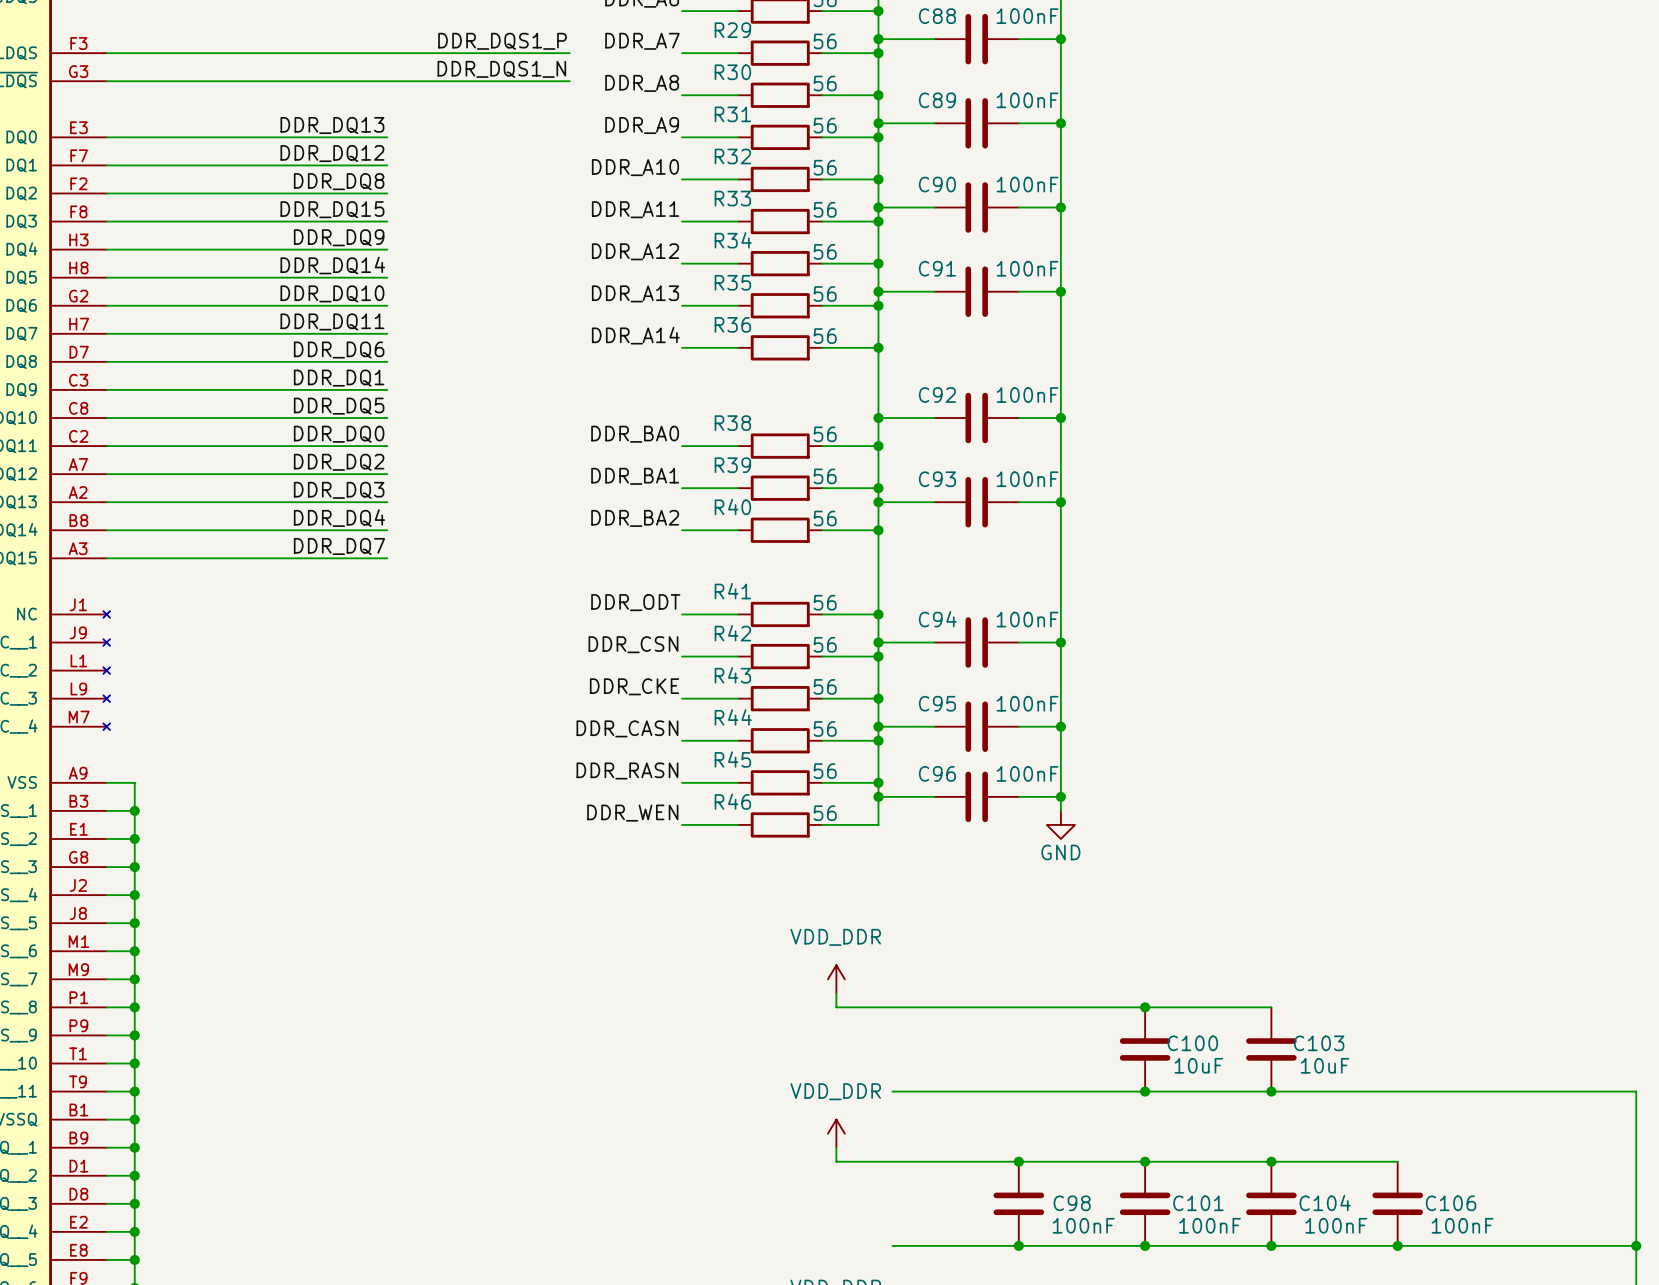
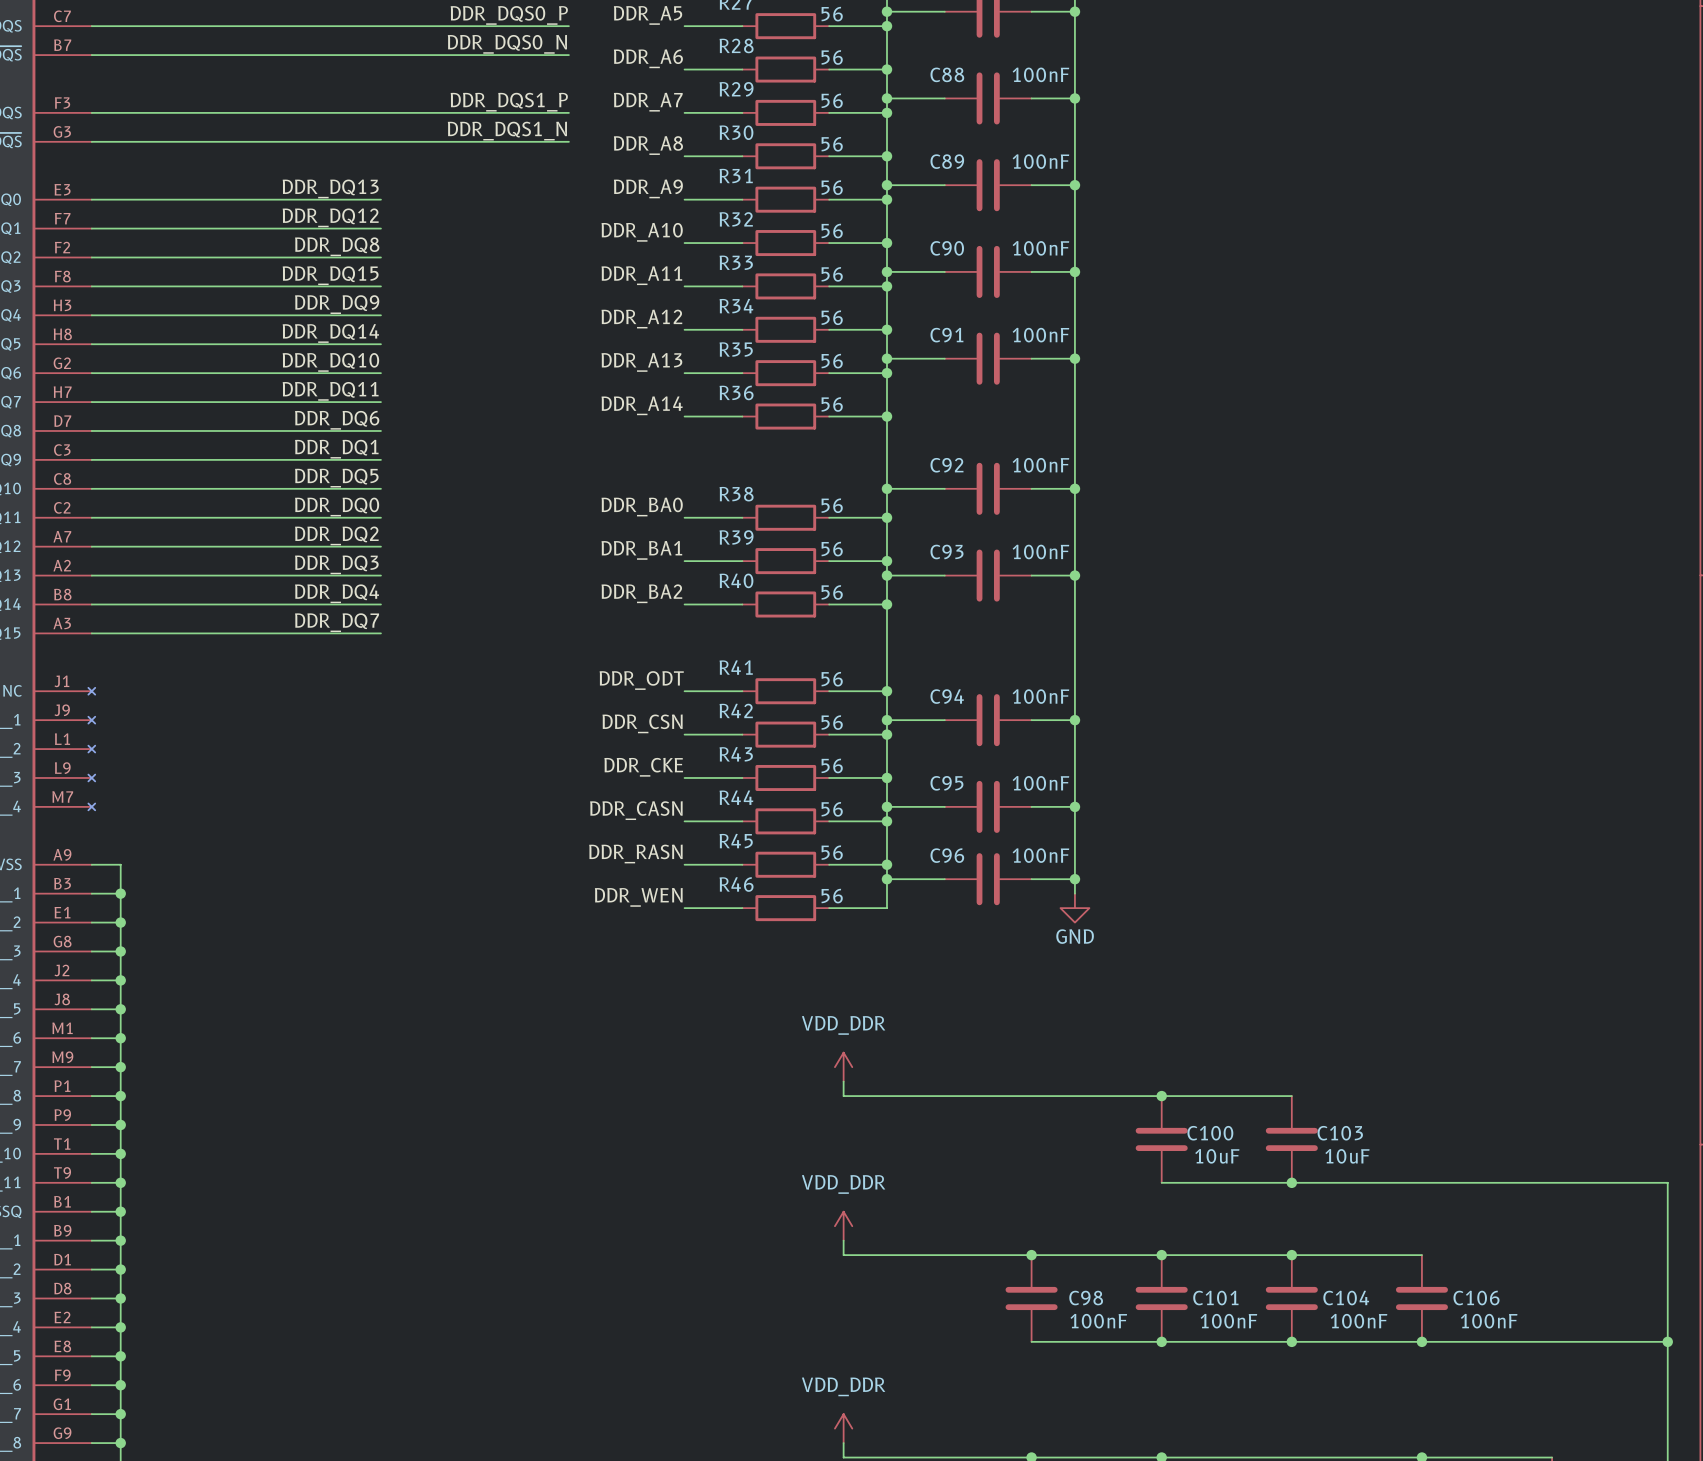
wire: (892, 1091) (1145, 1091) -> none
junction: (1145, 1091) -> none
wire: (892, 1245) (1018, 1245) -> none
junction: (1018, 1245) -> none

